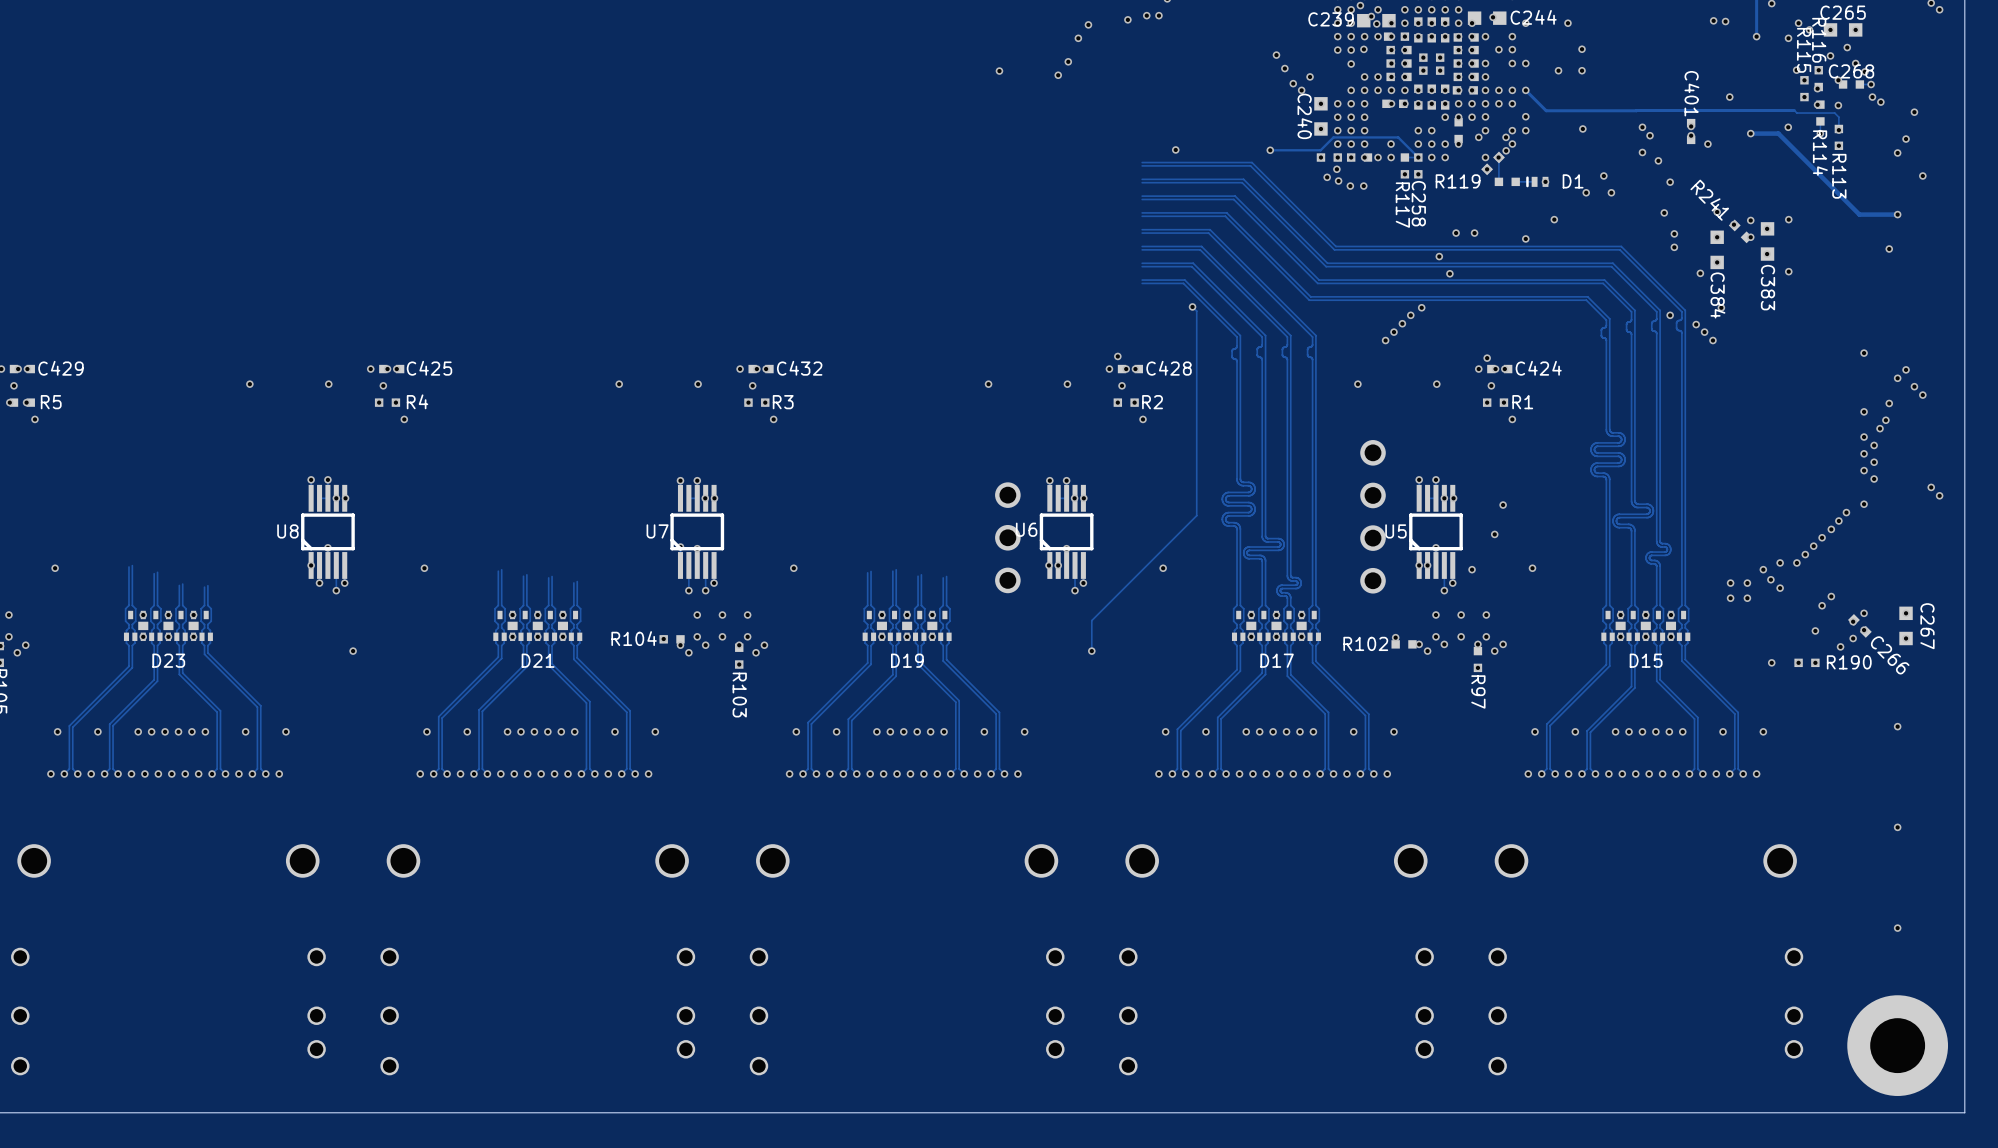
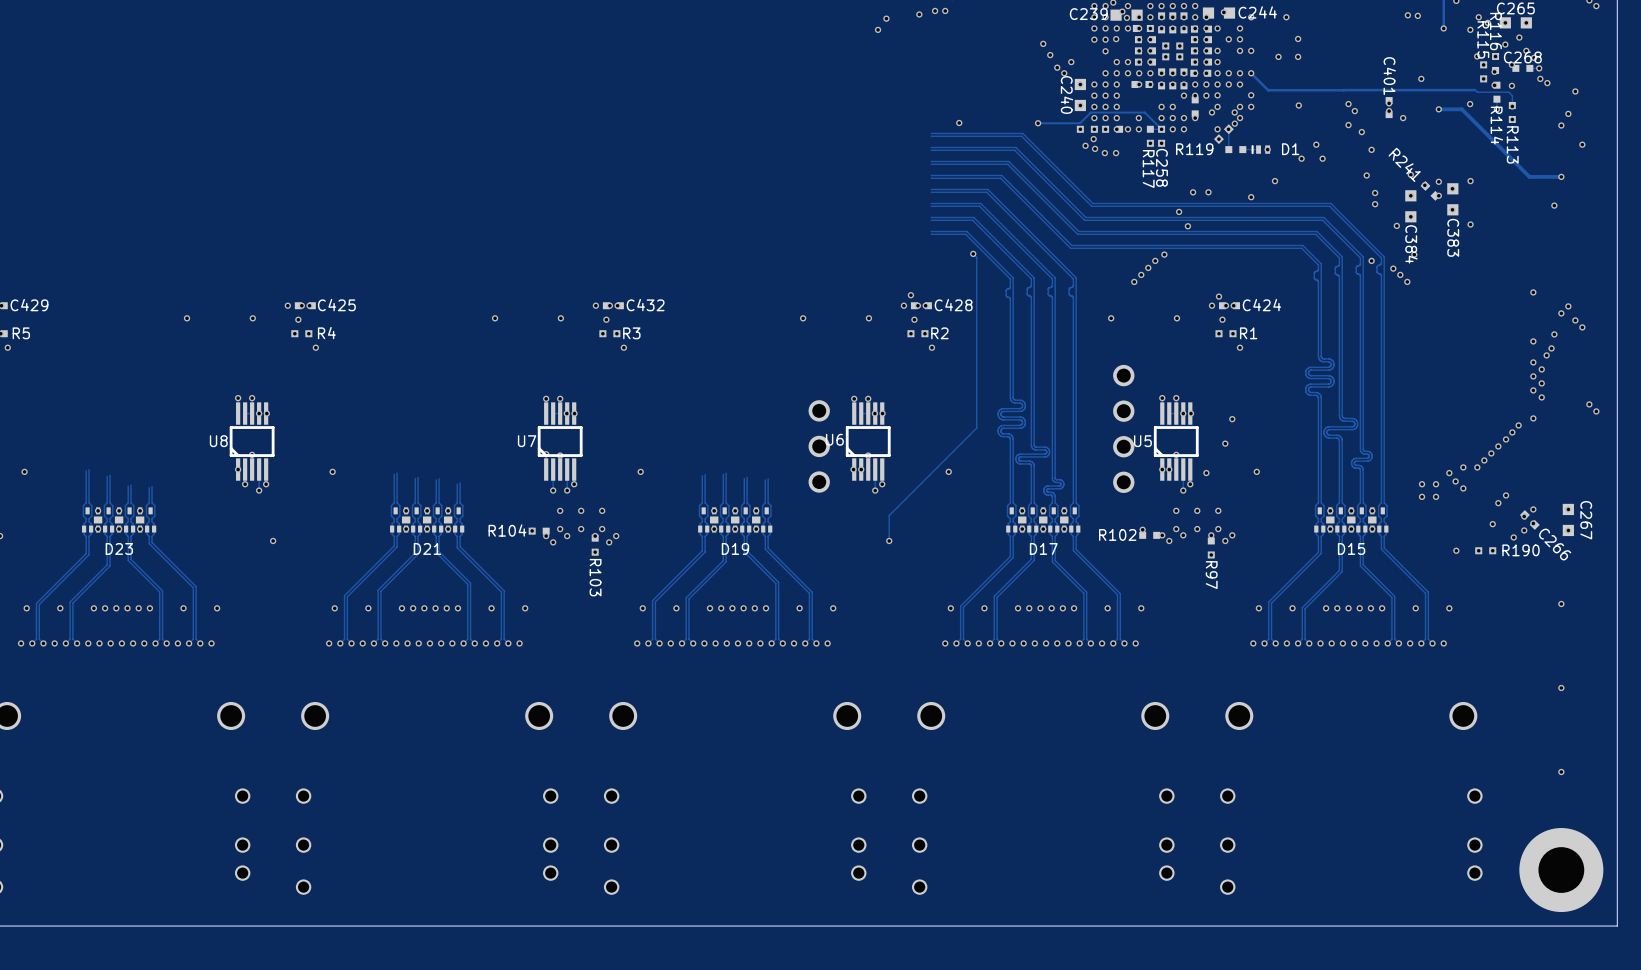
via: (1068, 61) -> none
via: (999, 71) -> none
via: (1058, 75) -> none

